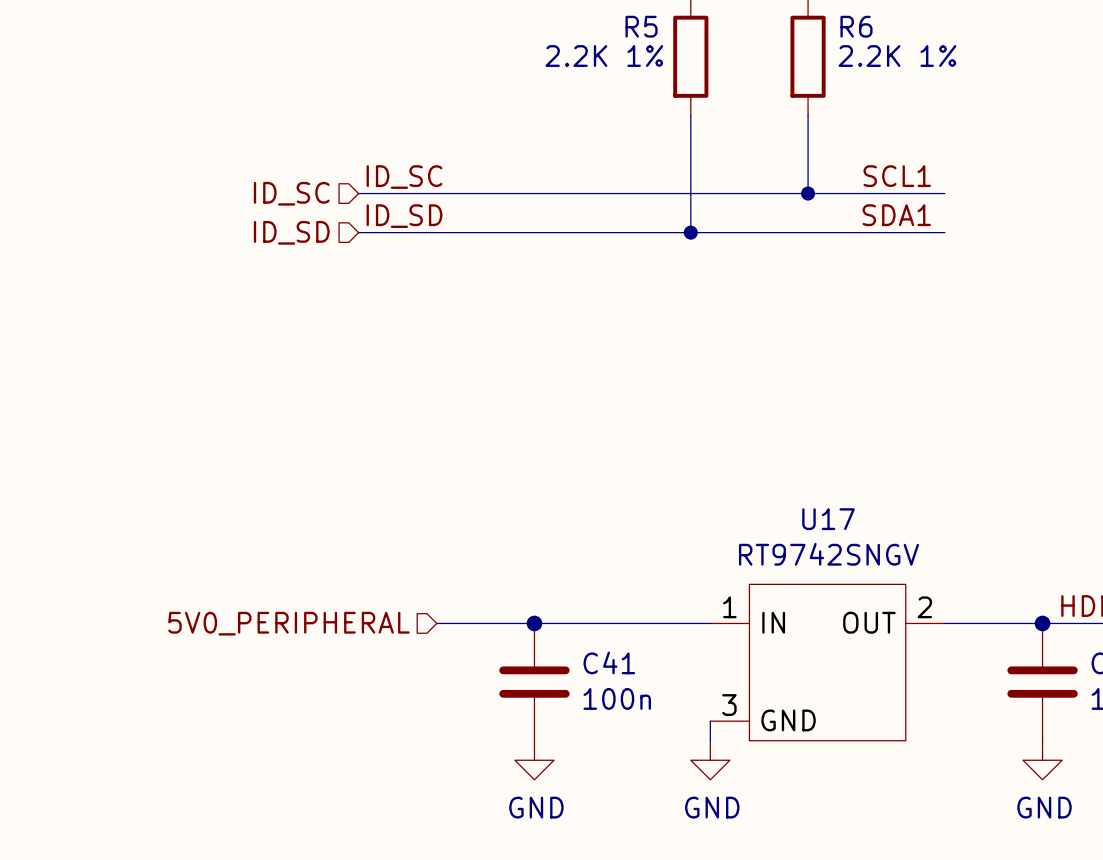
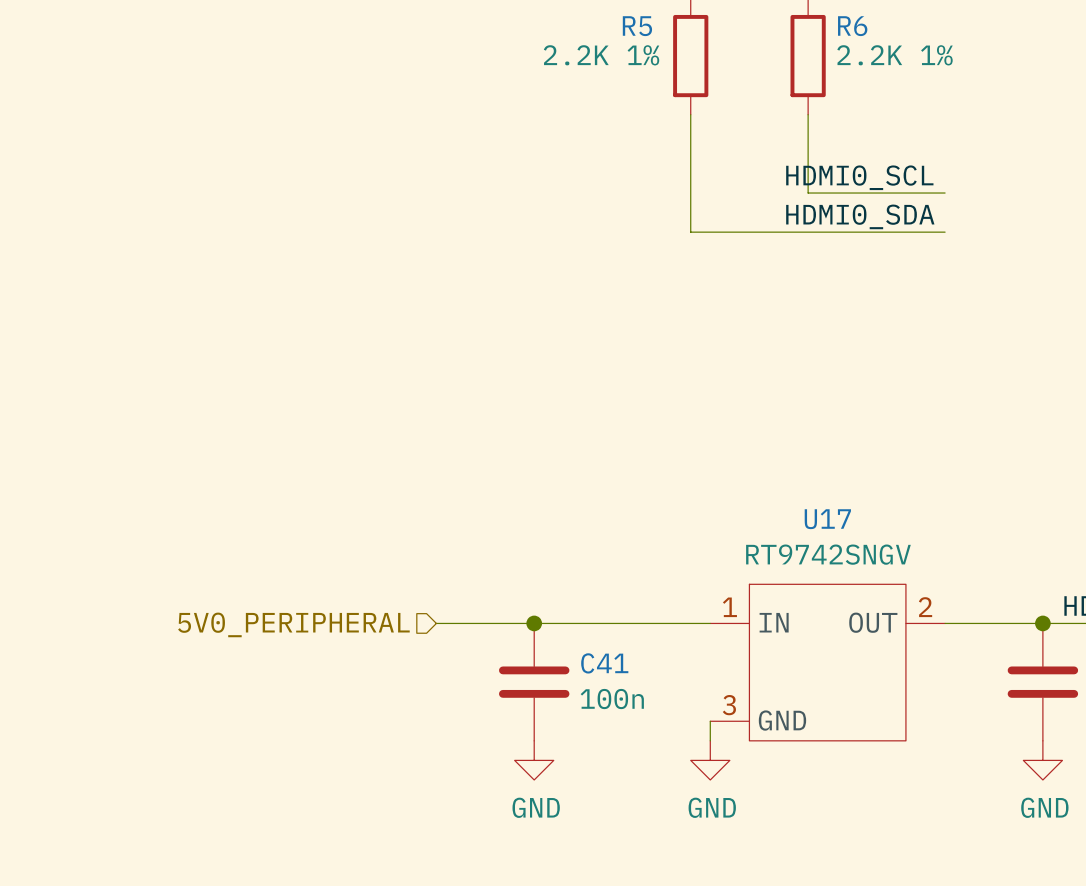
label: SCL1 (897, 176) -> HDMI0_SCL (859, 177)
label: ID_SC (404, 177) -> none
hierarchical label: ID_SC (291, 193) -> none
wire: (358, 193) (808, 193) -> none
junction: (808, 193) -> none
label: SDA1 (896, 215) -> HDMI0_SDA (860, 216)
label: ID_SD (404, 216) -> none
hierarchical label: ID_SD (291, 232) -> none
wire: (358, 232) (690, 232) -> none
junction: (690, 232) -> none

